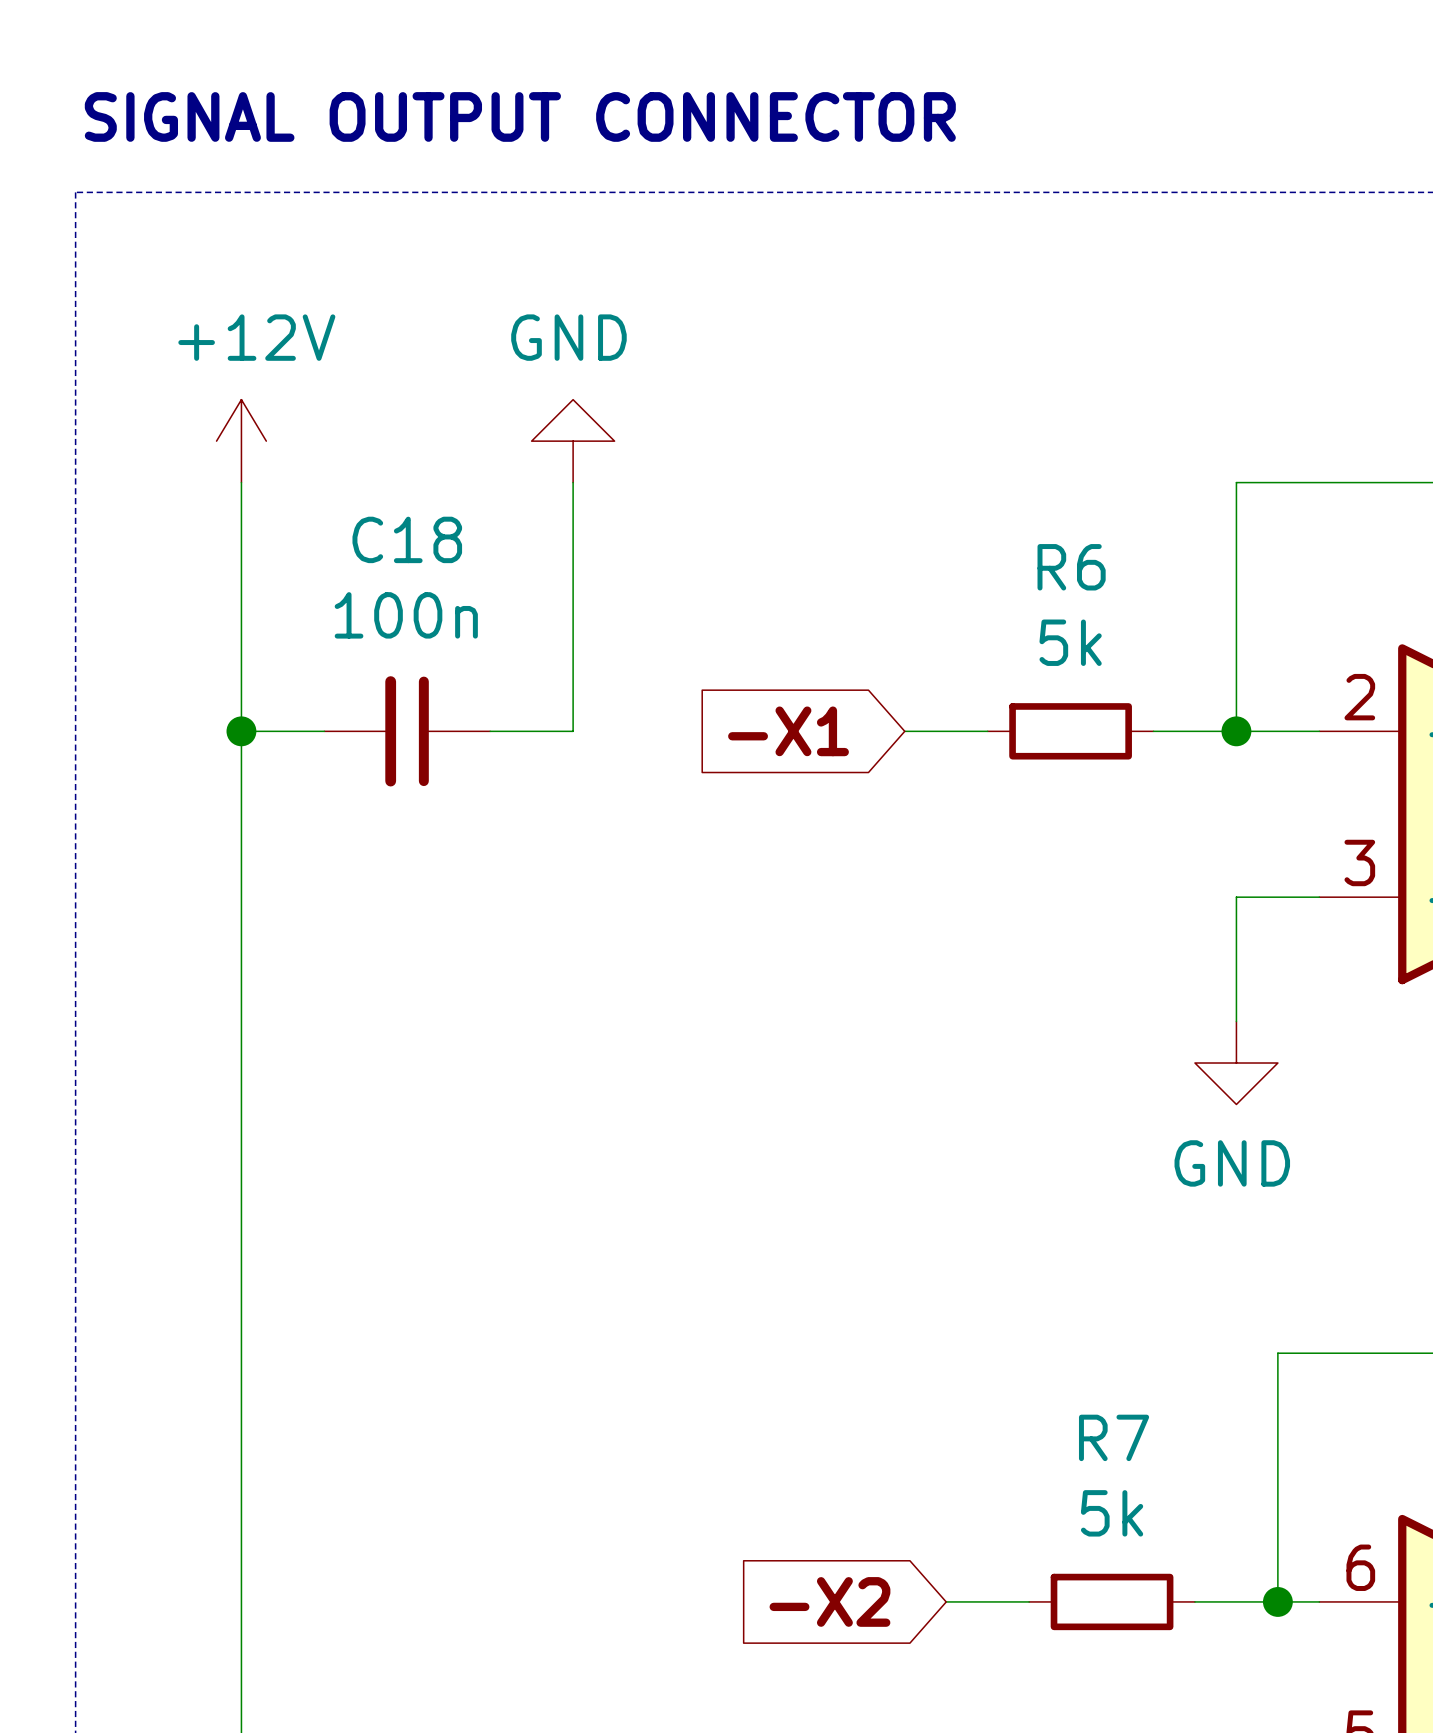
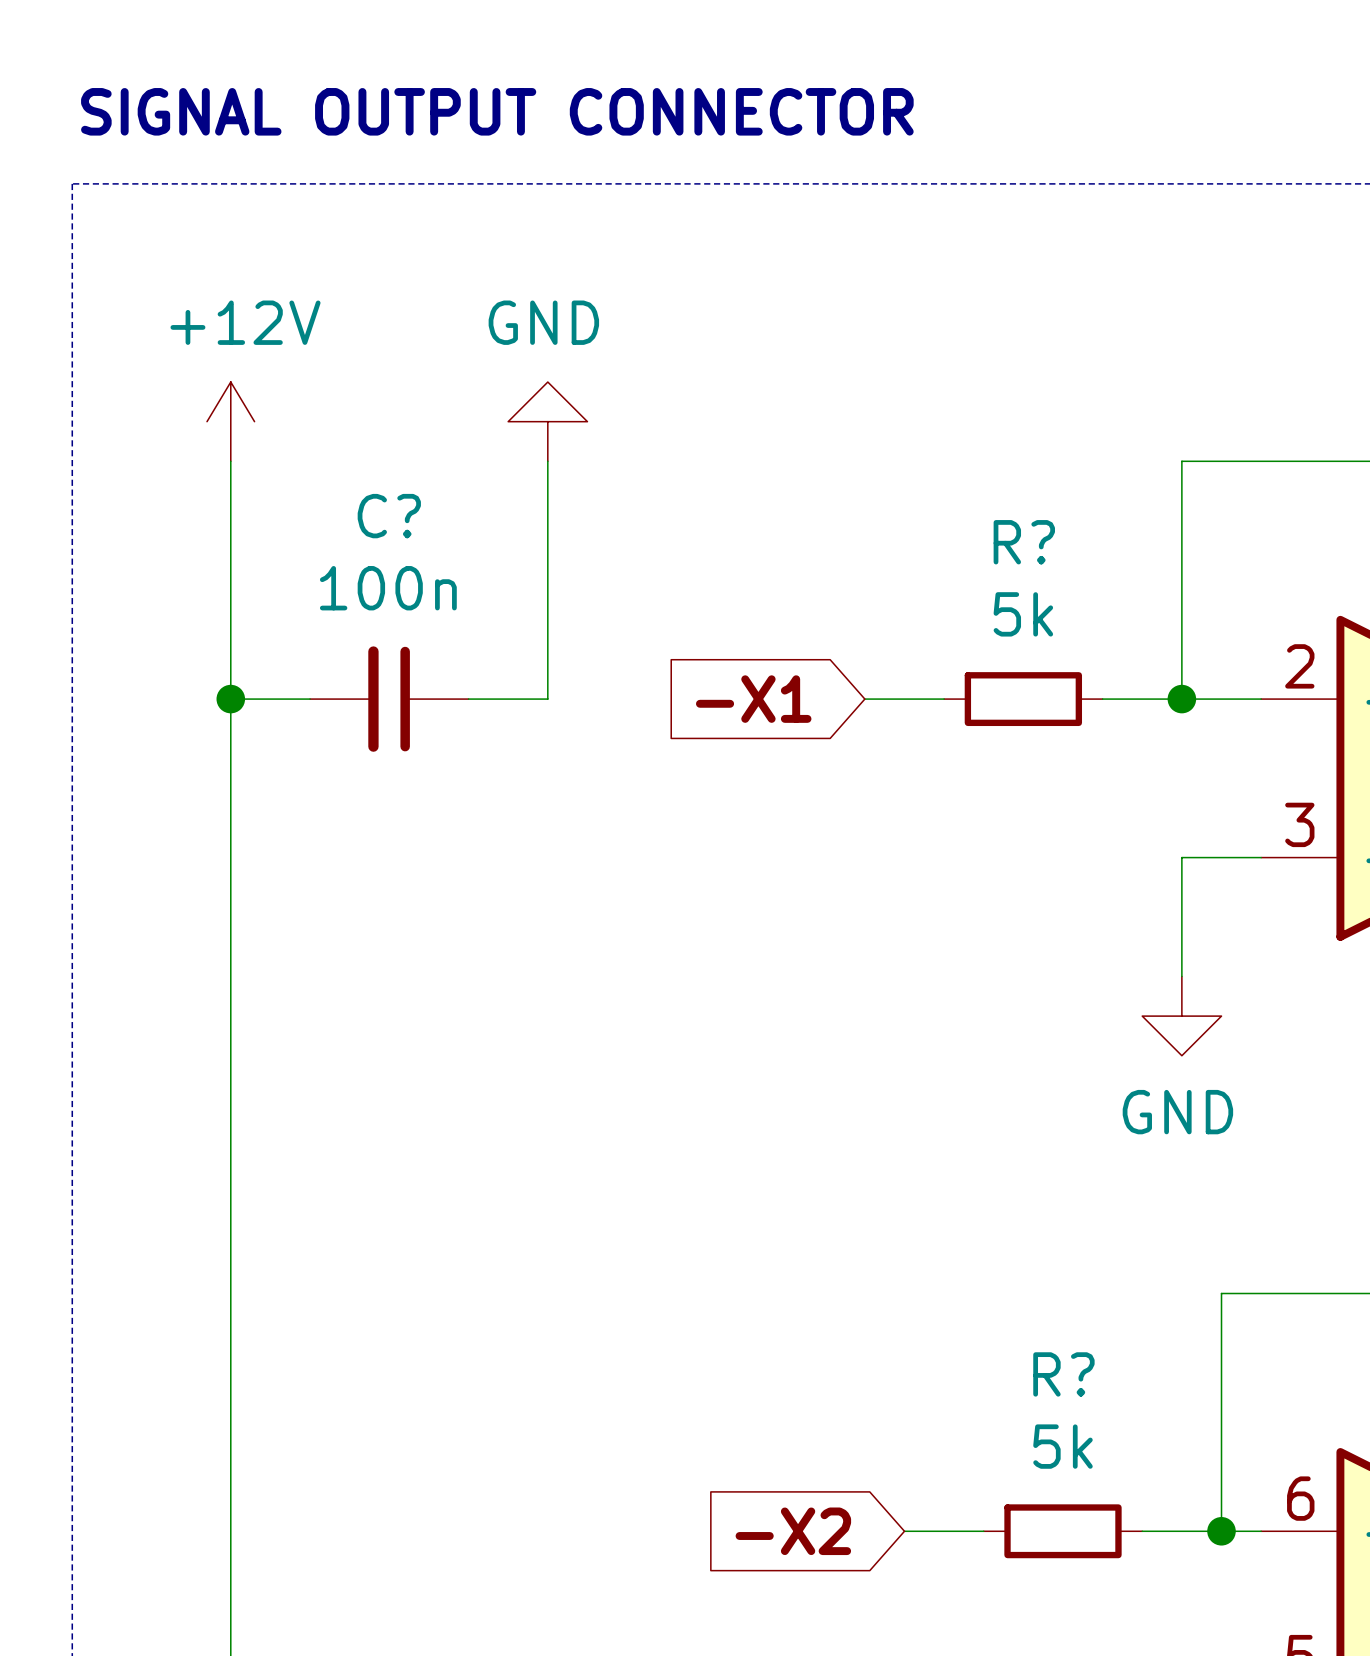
C18 name: C18 (407, 539) -> C? (389, 516)
R6 name: R6 (1071, 567) -> R? (1024, 542)
R7 name: R7 (1114, 1437) -> R? (1063, 1374)

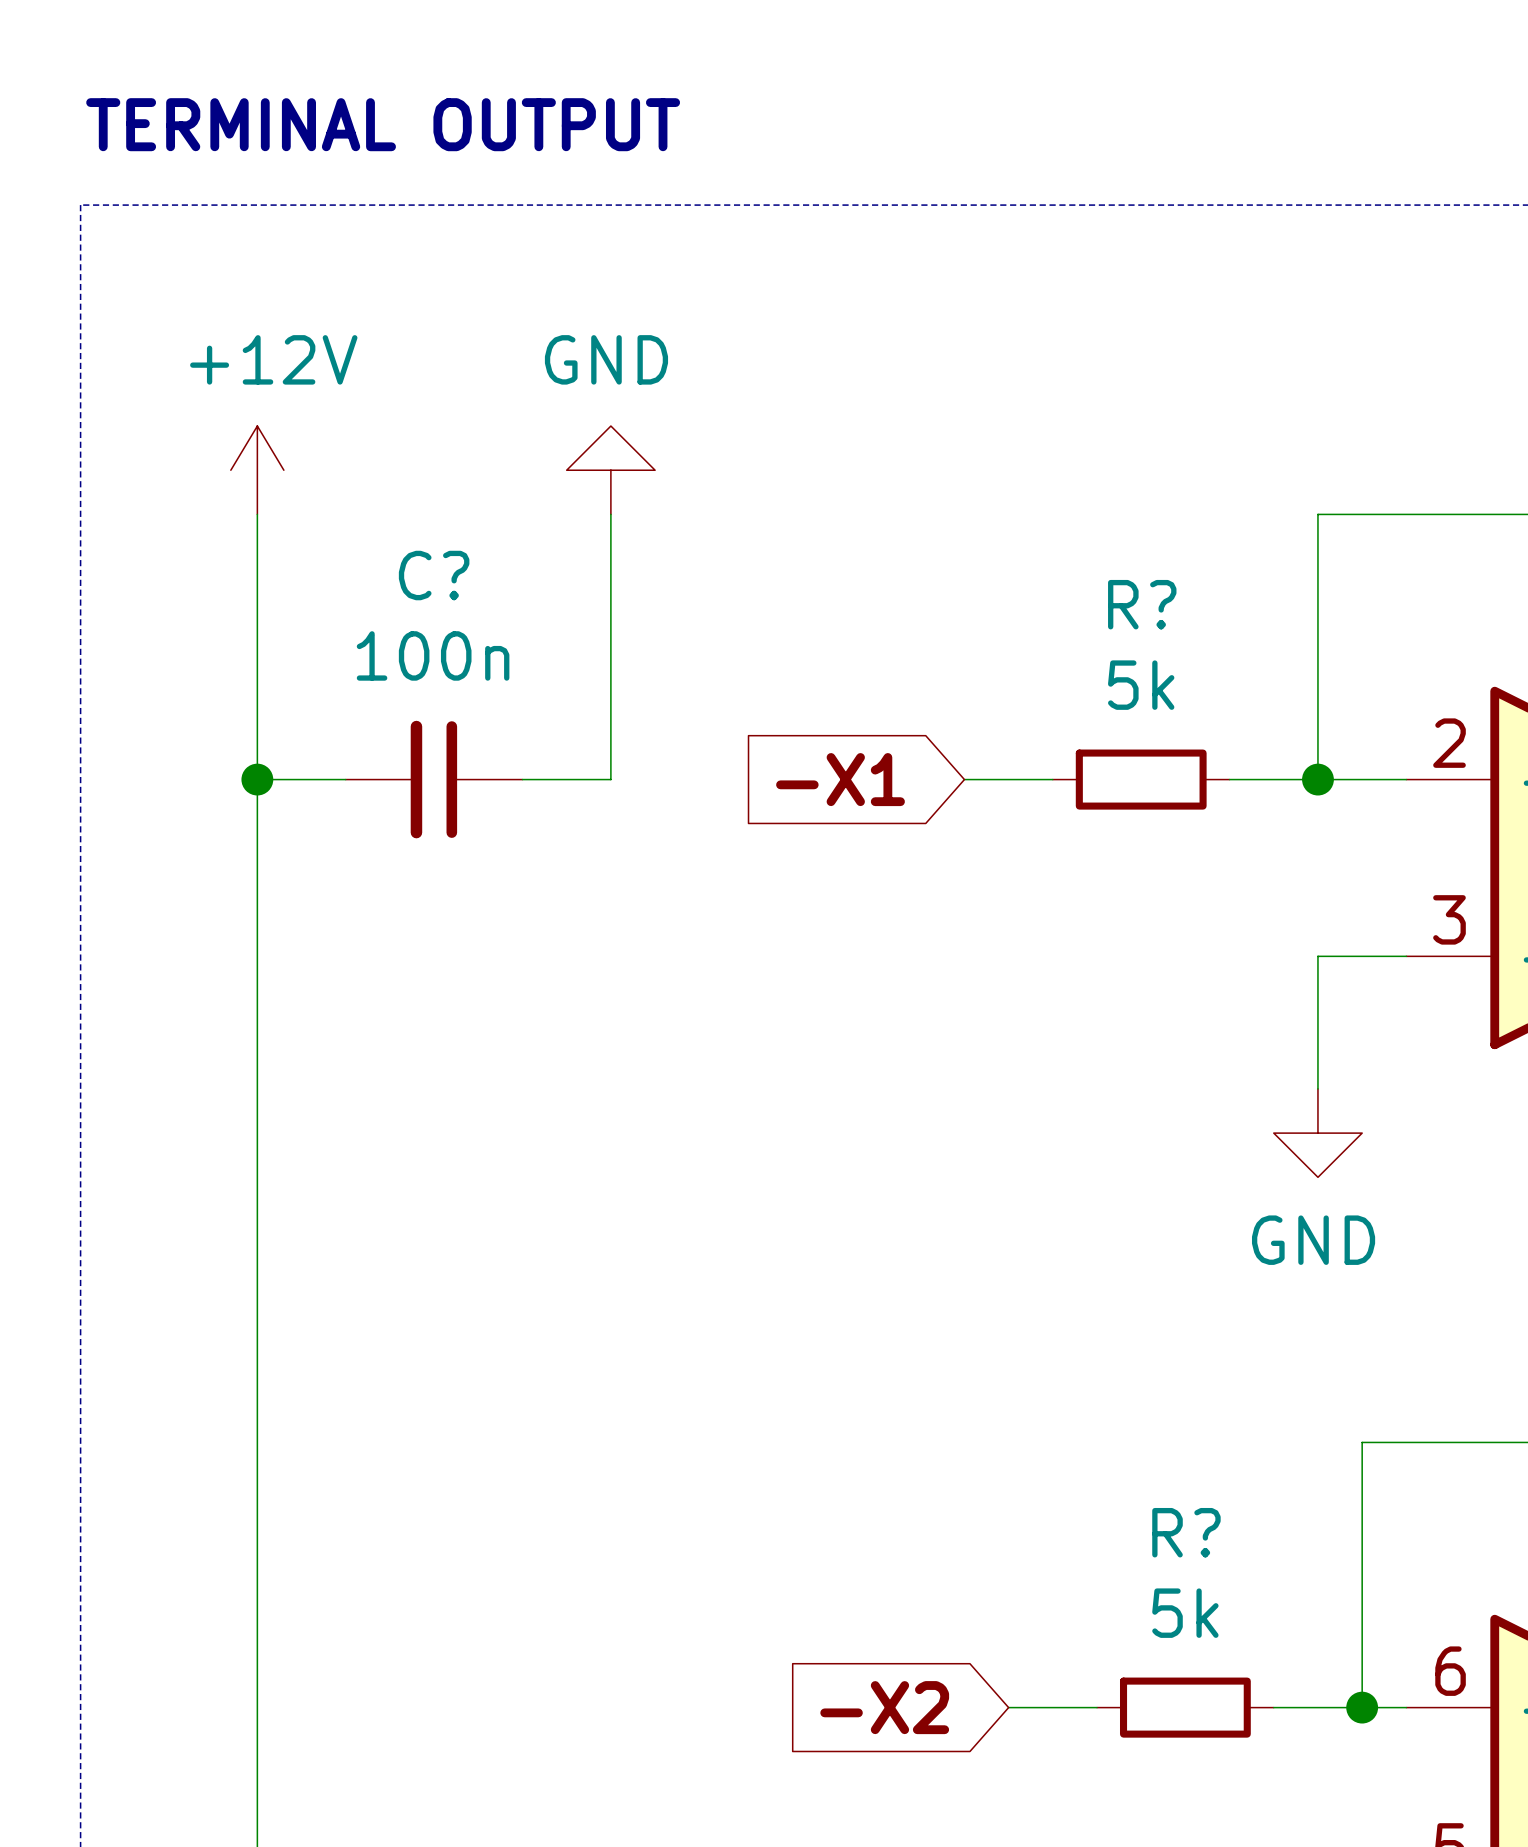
text: SIGNAL OUTPUT CONNECTOR (497, 111) -> TERMINAL OUTPUT (383, 124)

